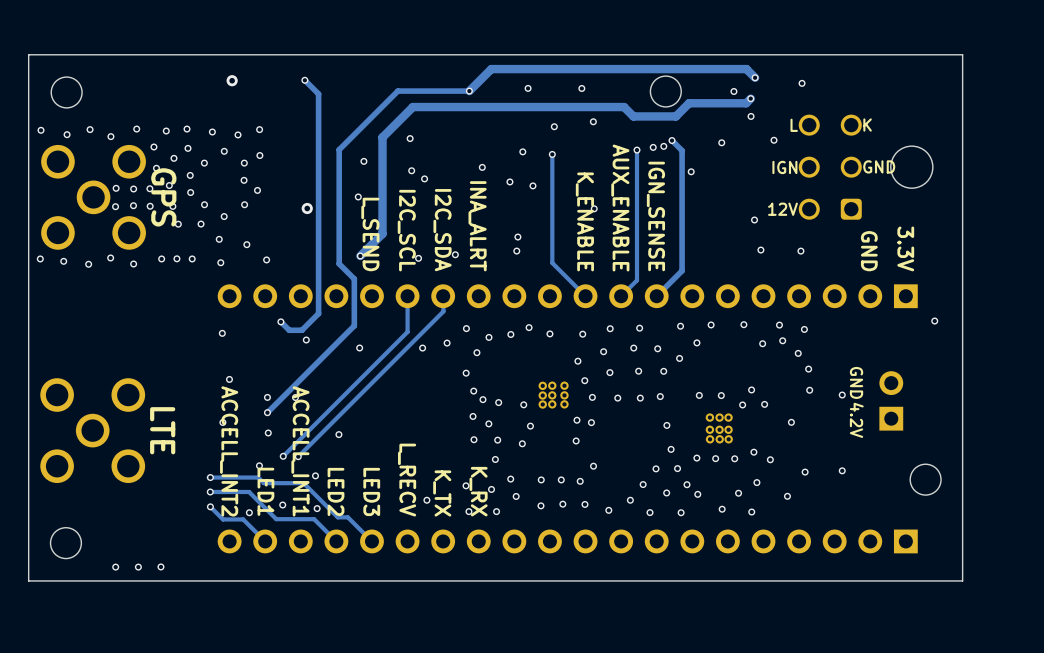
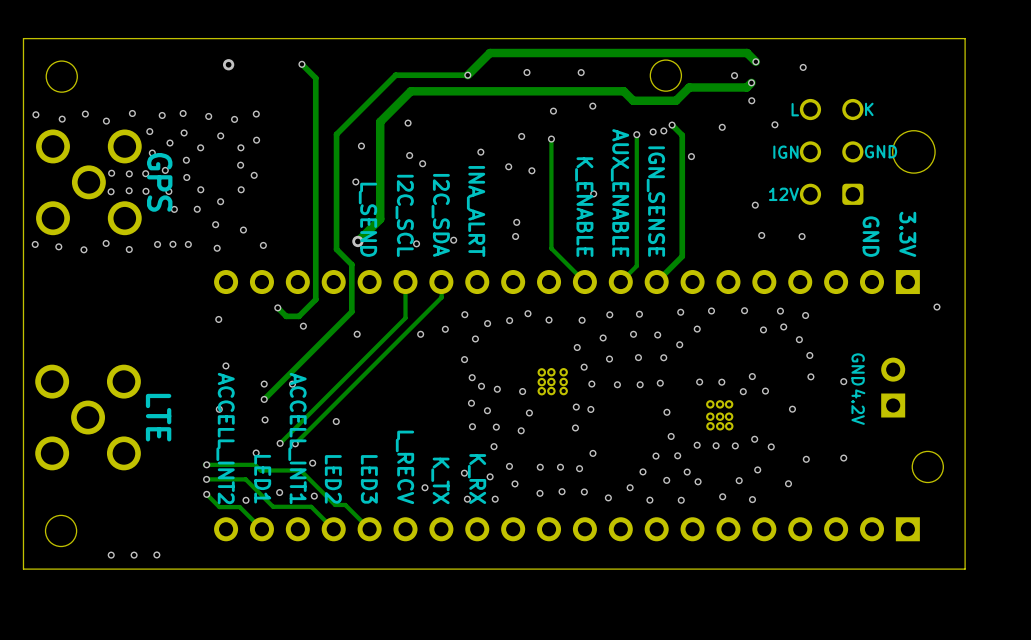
via position: (307, 208) -> (357, 241)
via: (360, 256) -> none

